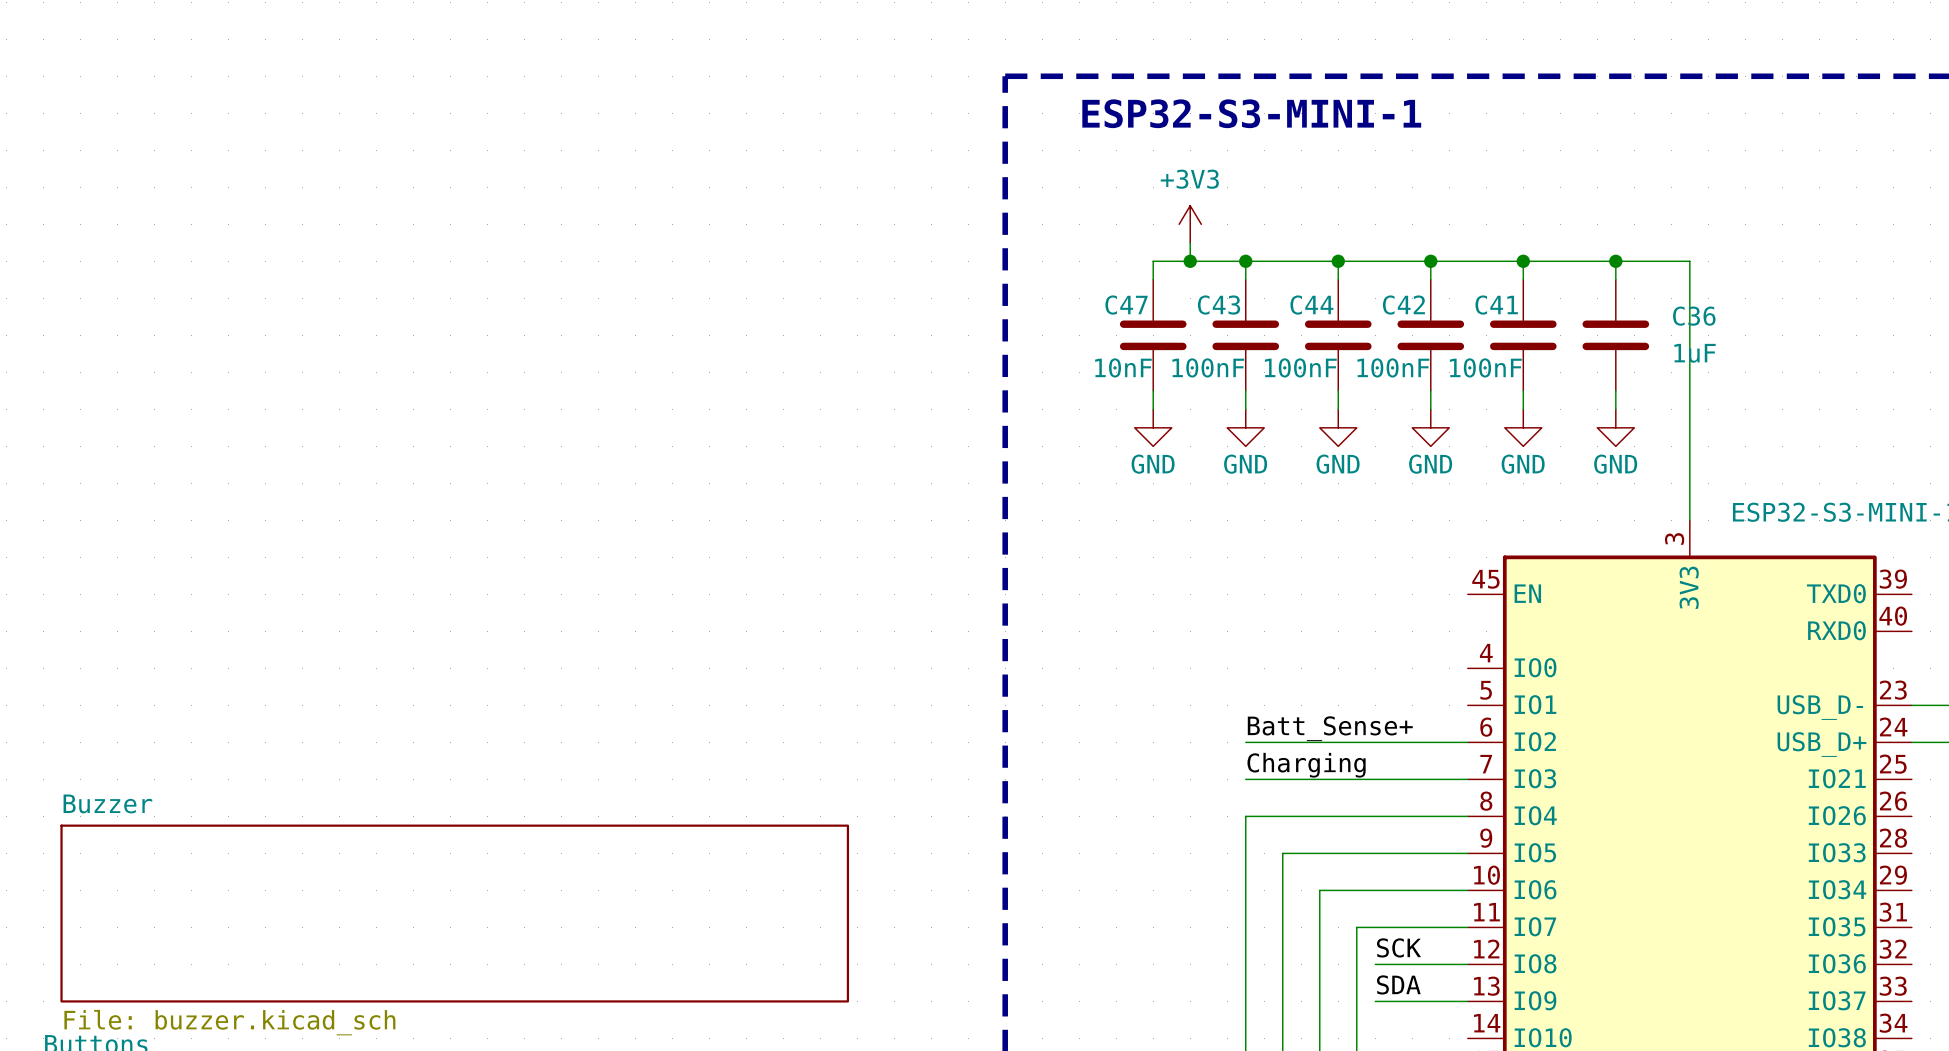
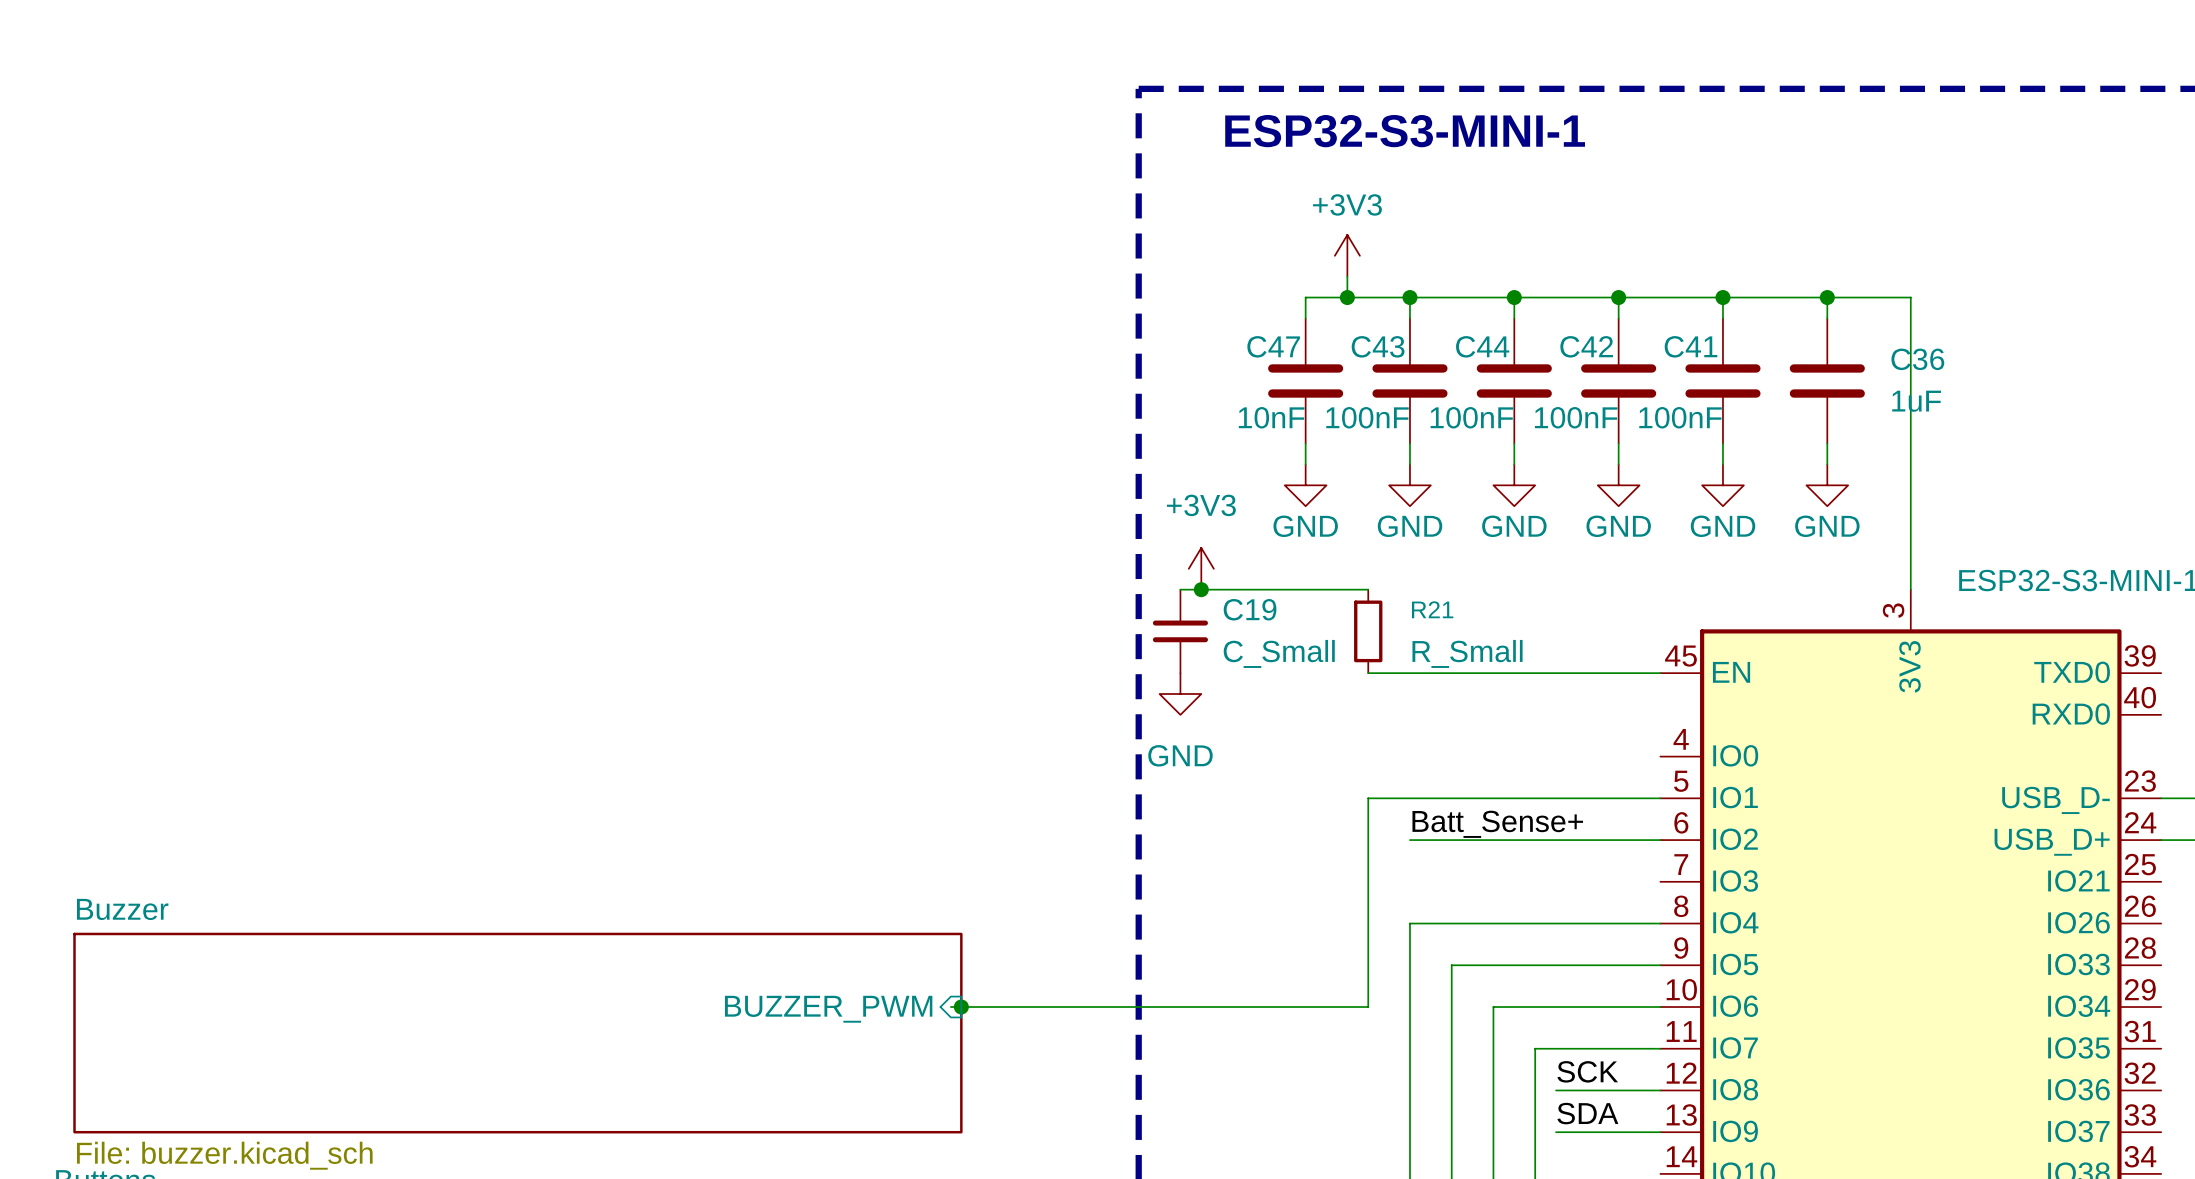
power symbol: none -> +3V3 (1201, 568)
wire: none -> (1180, 589) (1368, 589)
junction: none -> (1201, 589)
C19: none -> C_Small (1180, 631)
R21: none -> R_Small (1368, 631)
wire: none -> (1368, 673) (1660, 673)
power symbol: none -> GND (1180, 694)
wire: none -> (1660, 798) (1368, 798) (1368, 1007) (950, 1007)
label: Charging (1306, 765) -> none
wire: (1245, 779) (1467, 779) -> none
junction: none -> (961, 1007)
sheet pin: none -> BUZZER_PWM (828, 1009)

